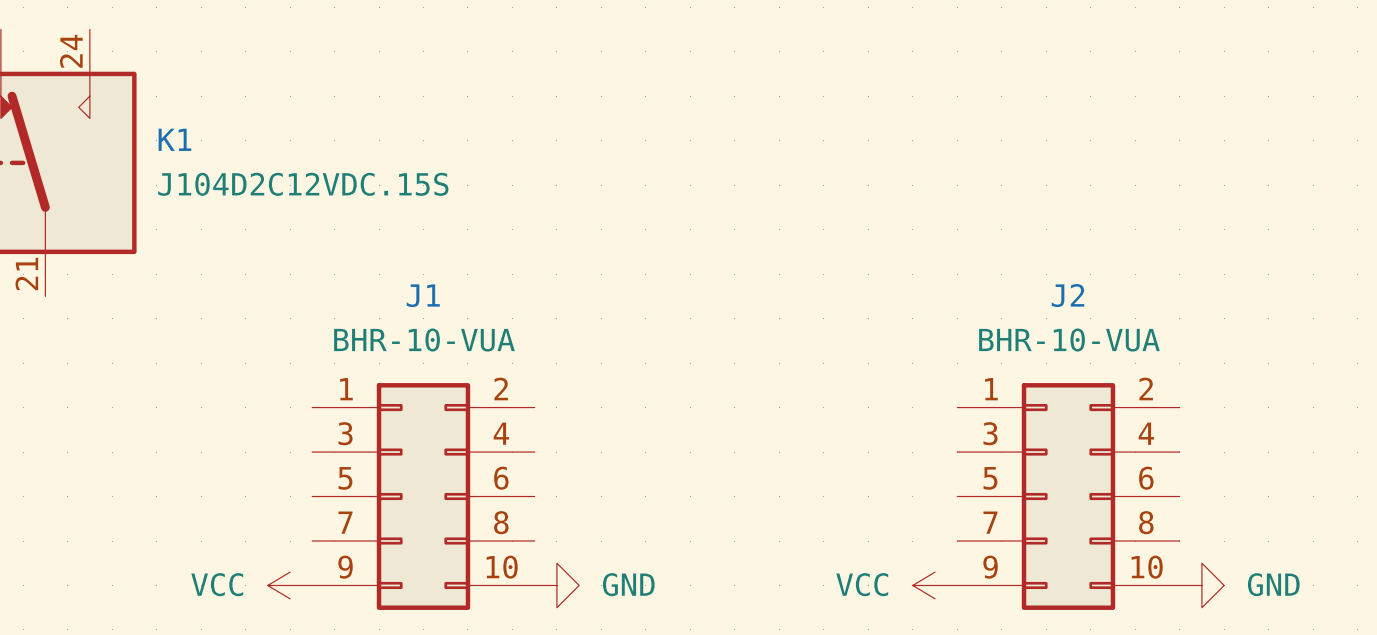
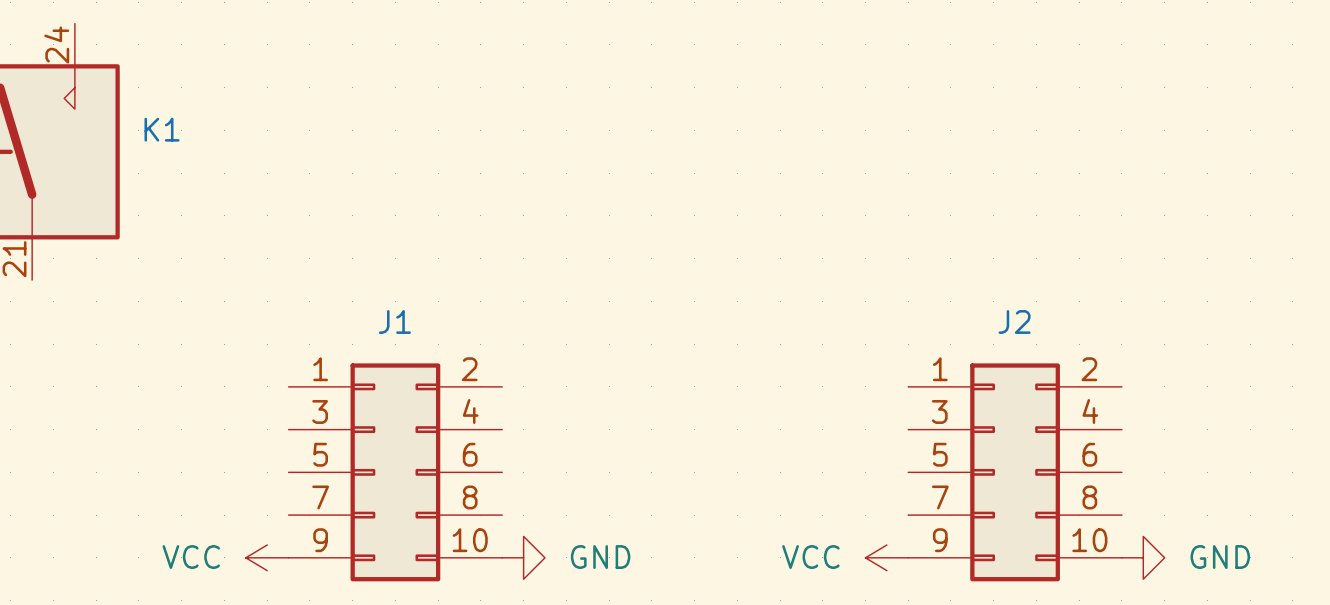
K1 value: J104D2C12VDC.15S (303, 184) -> none
J1 name position: J1 (423, 295) -> J1 (394, 321)
J2 name position: J2 (1068, 295) -> J2 (1014, 321)
J1 value: BHR-10-VUA (424, 340) -> none
J2 value: BHR-10-VUA (1069, 340) -> none

